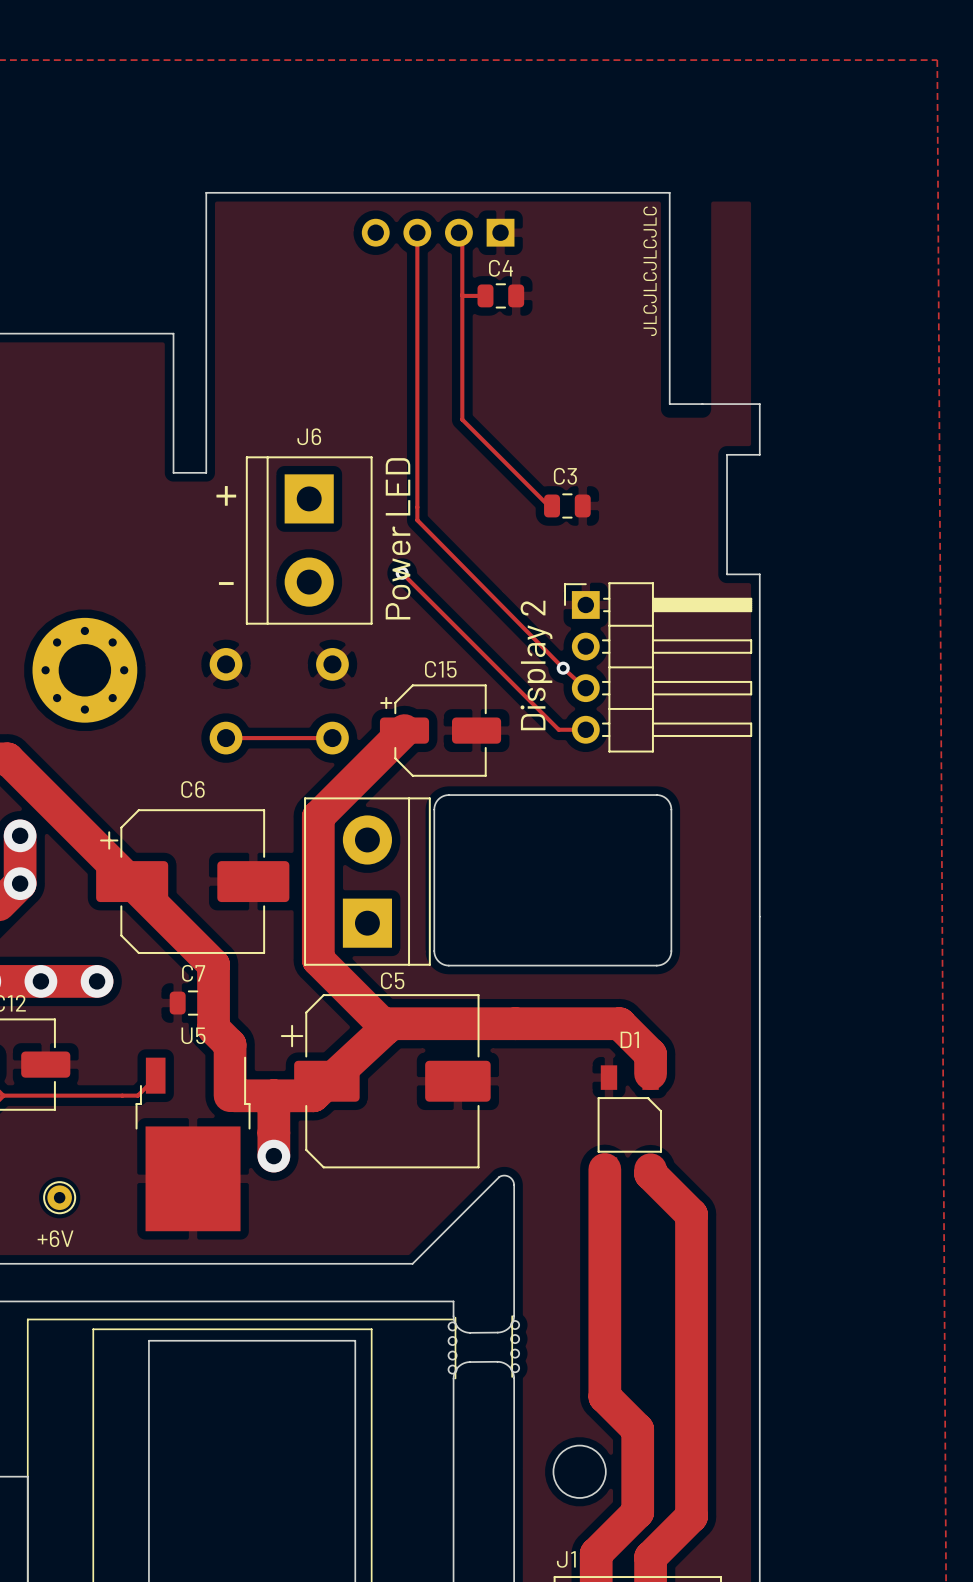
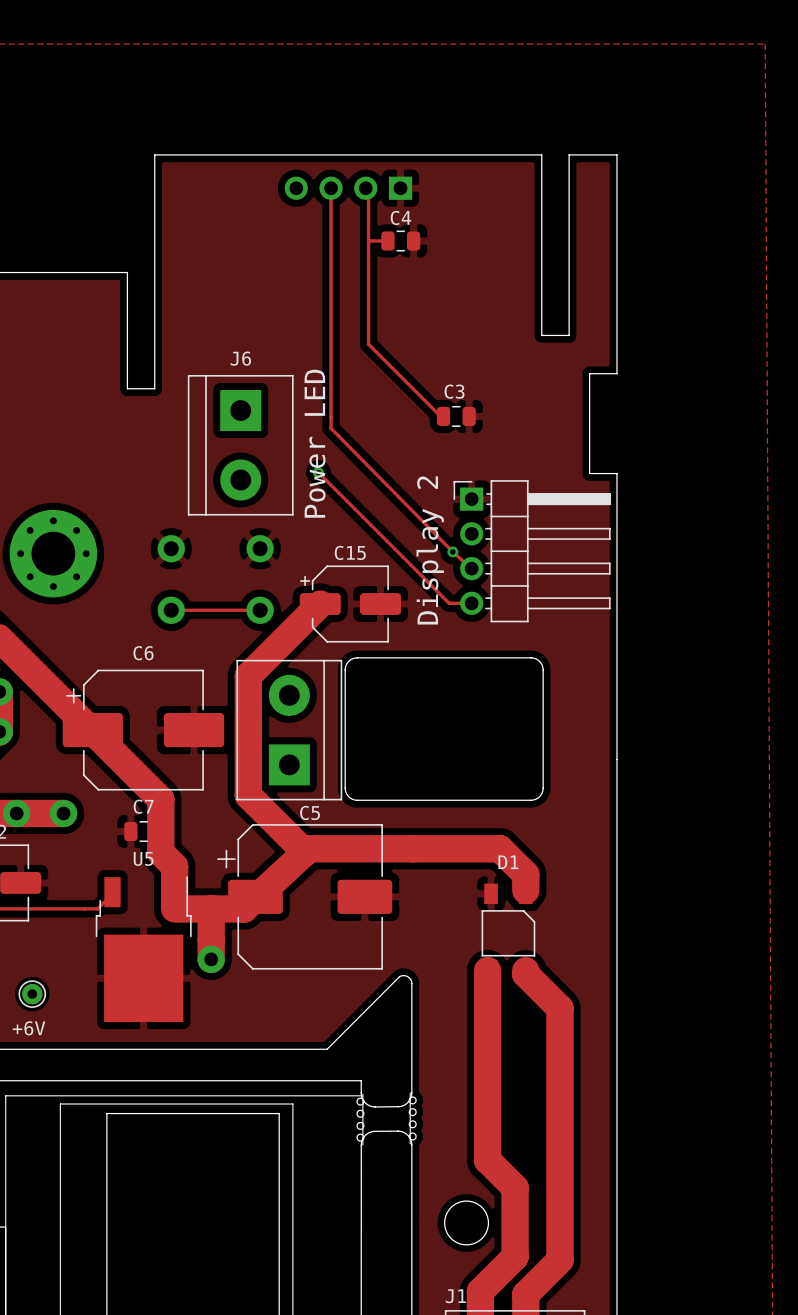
text: JLCJLCJLCJLC (650, 271) -> none
board edge: (669, 404) (759, 404) -> (541, 331) (541, 335) (569, 335) (569, 154) (616, 154) (616, 331)
text: + (226, 495) -> none
text: - (226, 583) -> none

